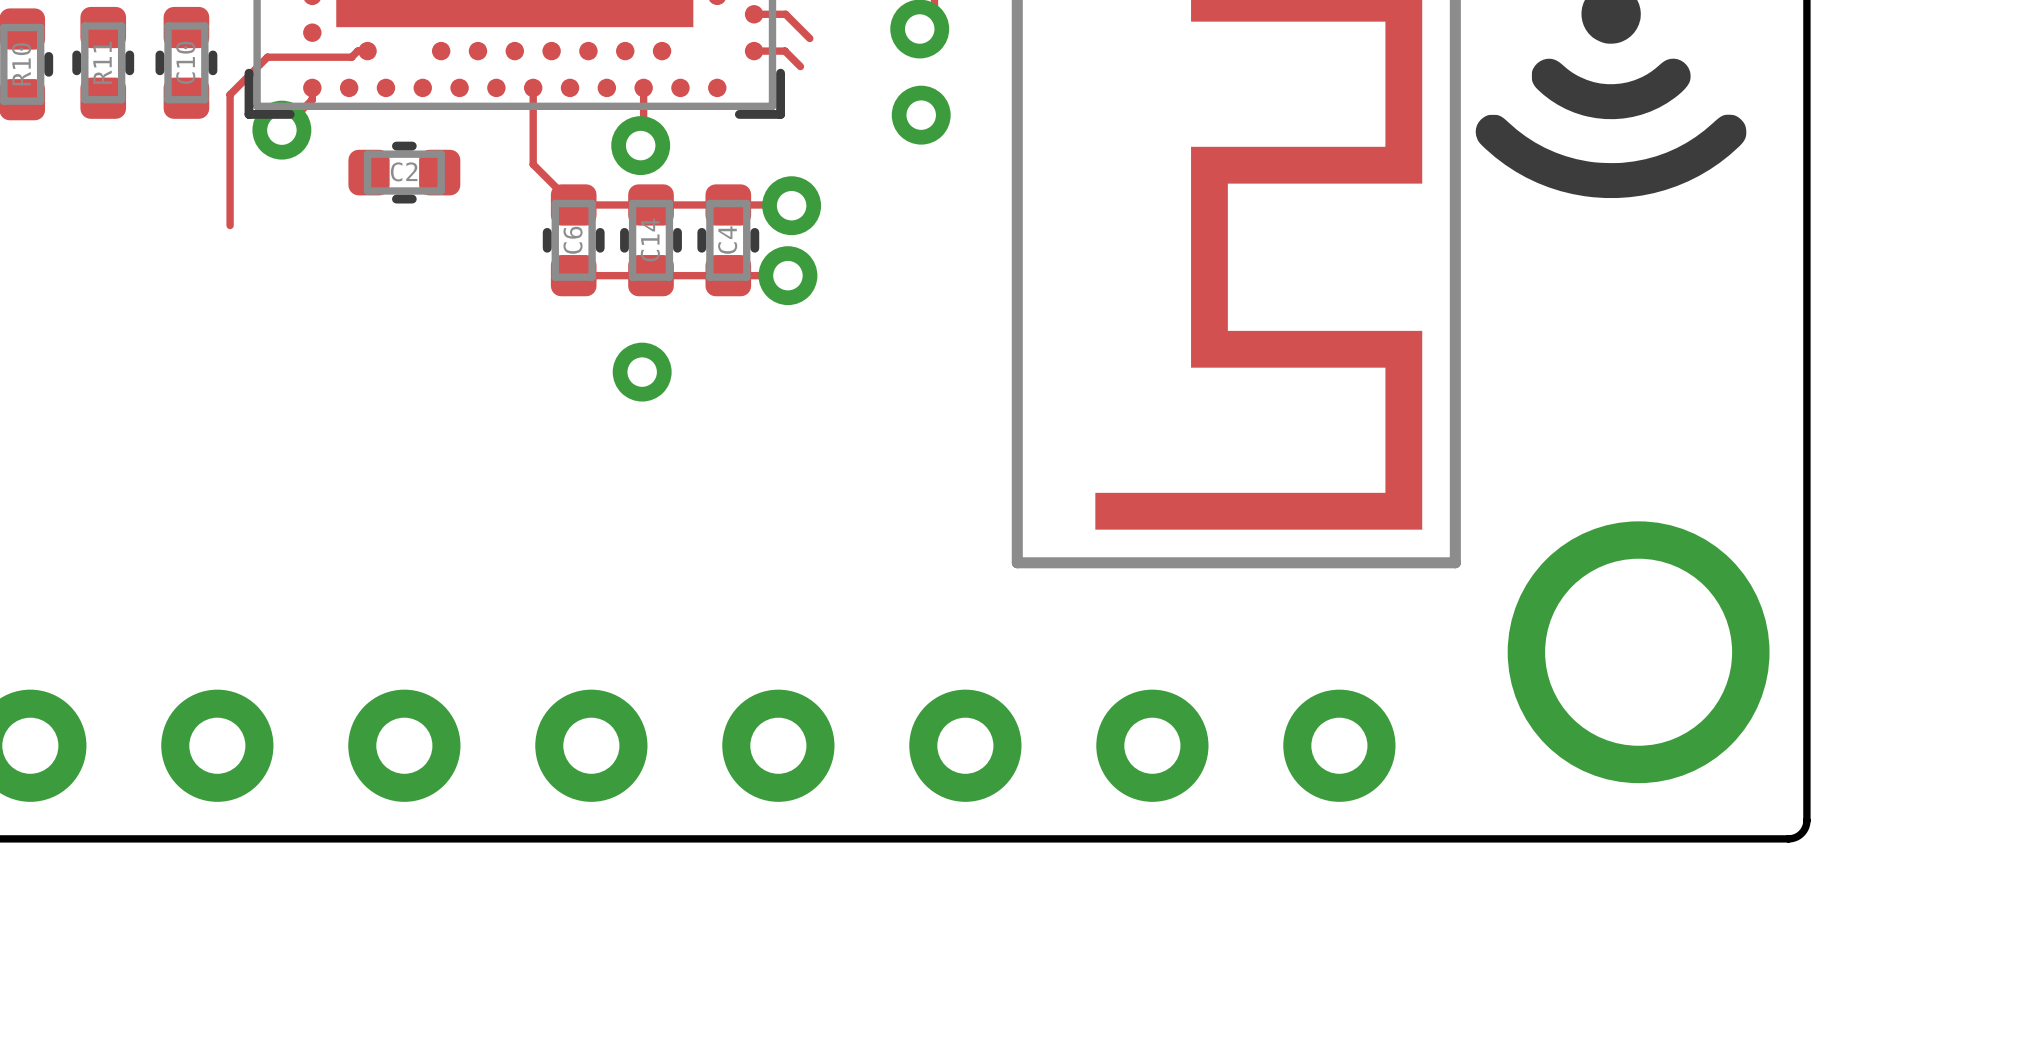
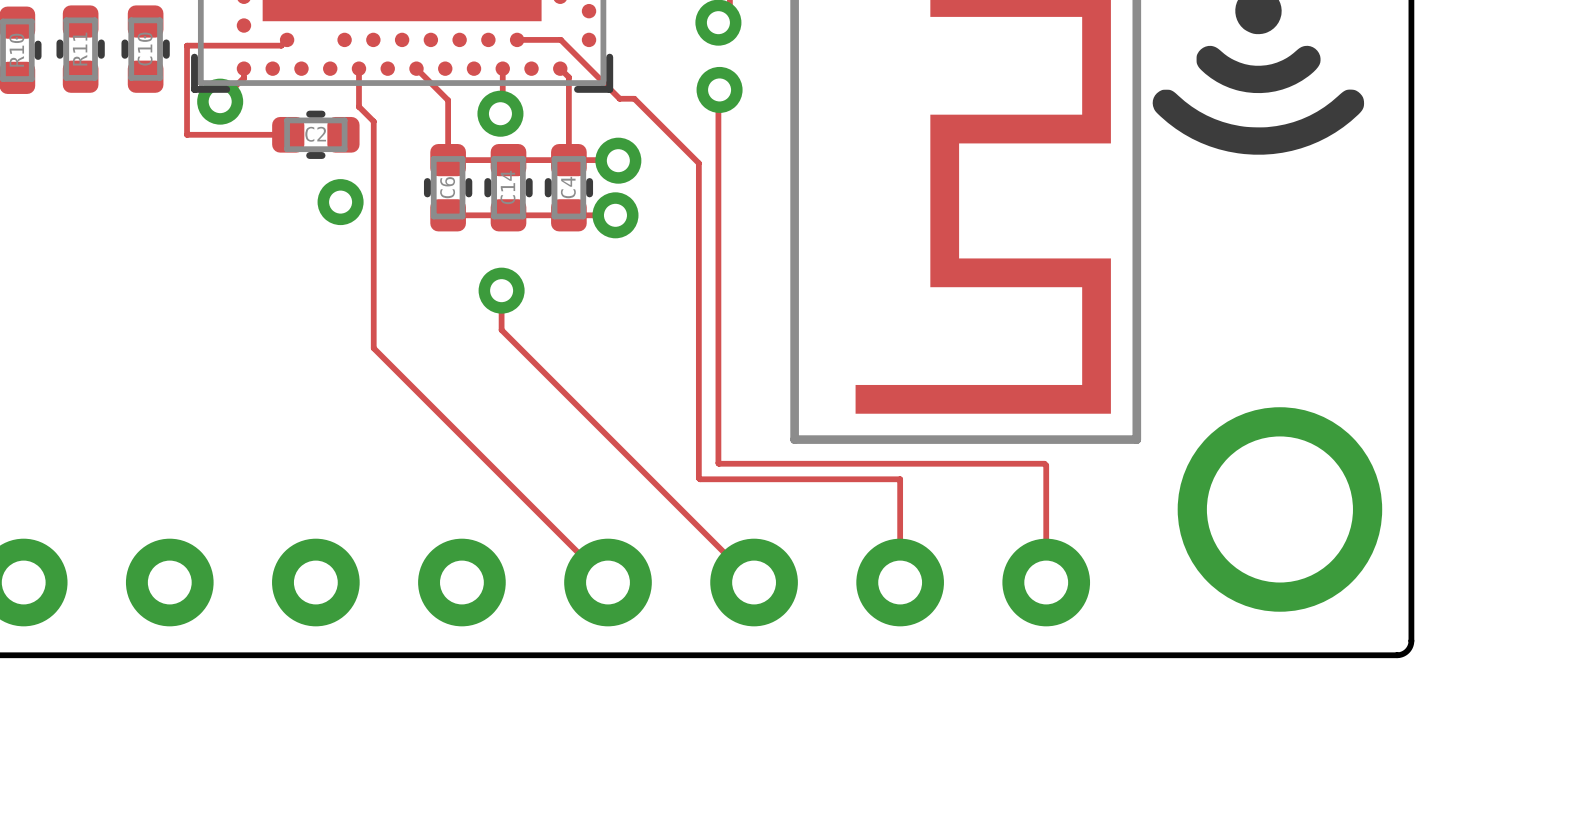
track: (754, 14) (785, 14) (809, 38) -> none
track: (367, 51) (357, 51) (351, 57) (267, 57) (230, 94) (230, 225) -> (287, 39) (281, 45) (187, 45) (187, 134) (288, 134)
track: none -> (517, 39) (560, 39) (619, 98) (634, 98) (698, 163) (698, 478) (900, 479) (900, 582)
track: (754, 51) (785, 51) (800, 66) -> none
track: none -> (358, 68) (358, 106) (373, 121) (373, 348) (607, 582)
track: (533, 87) (533, 164) (573, 204) -> (419, 68) (416, 68) (448, 100) (448, 160)
track: none -> (560, 68) (568, 77) (568, 160)
track: none -> (719, 89) (718, 463)
via: none -> (340, 202)
track: none -> (501, 290) (501, 330) (754, 582) (740, 582)
track: none -> (718, 463) (1044, 463) (1046, 465) (1046, 582)

